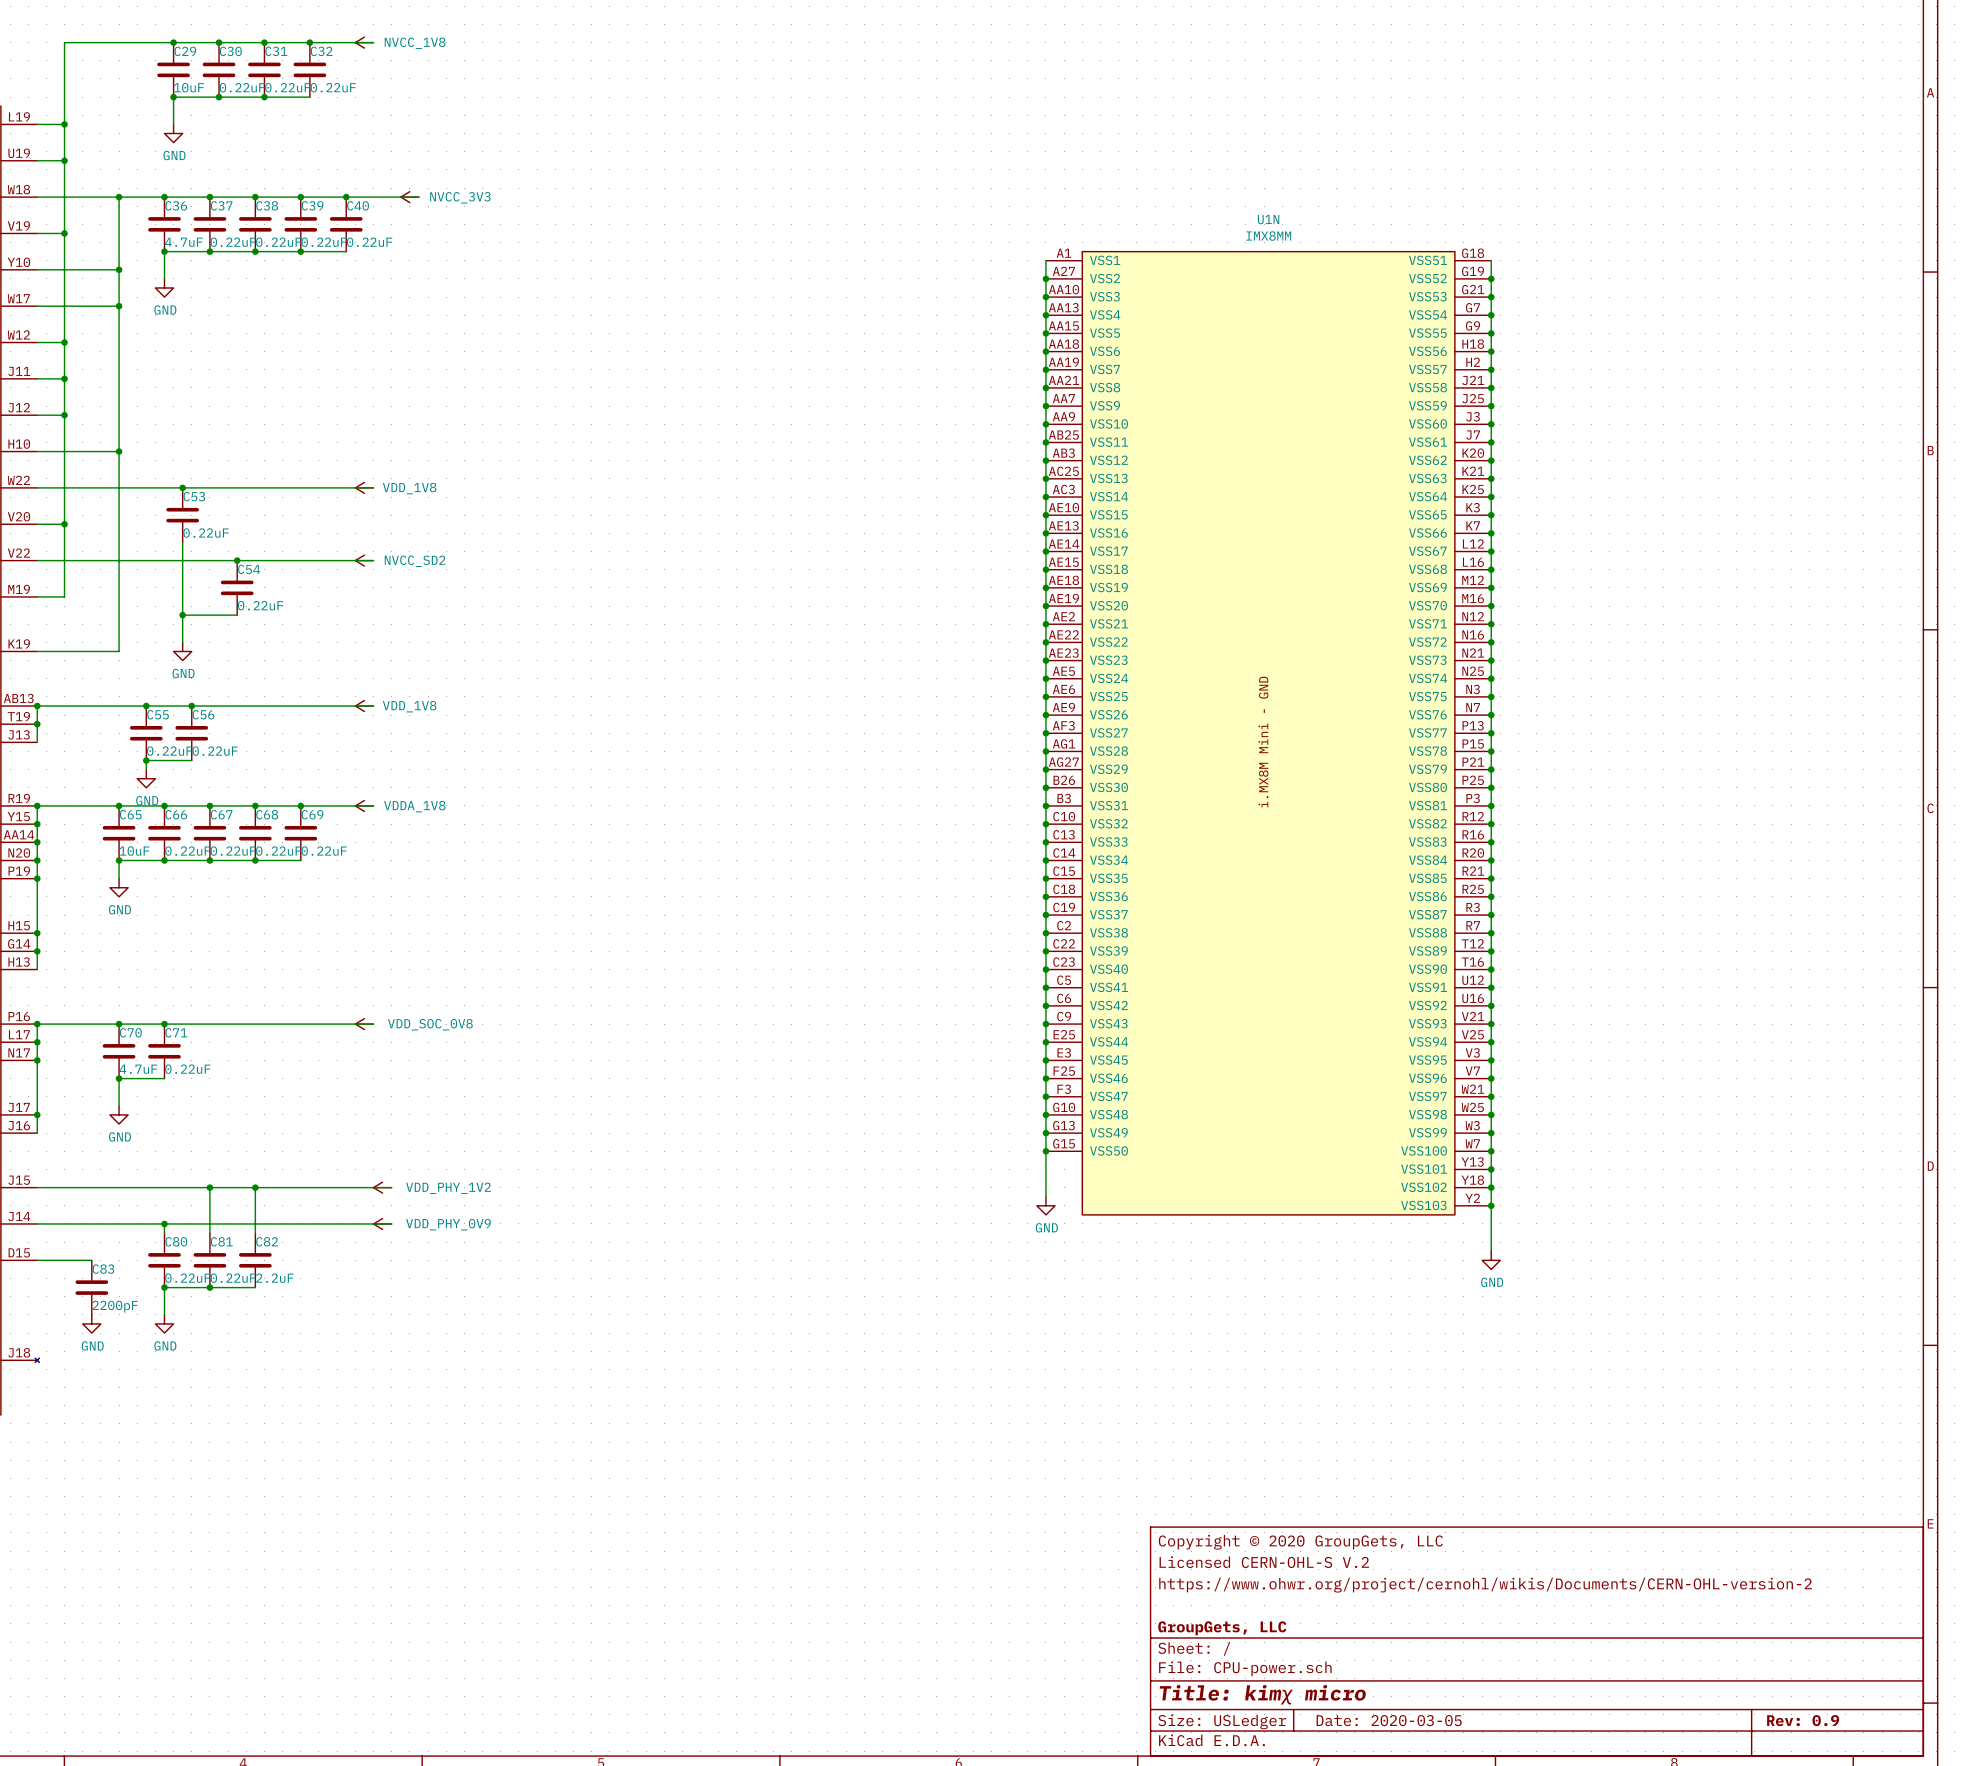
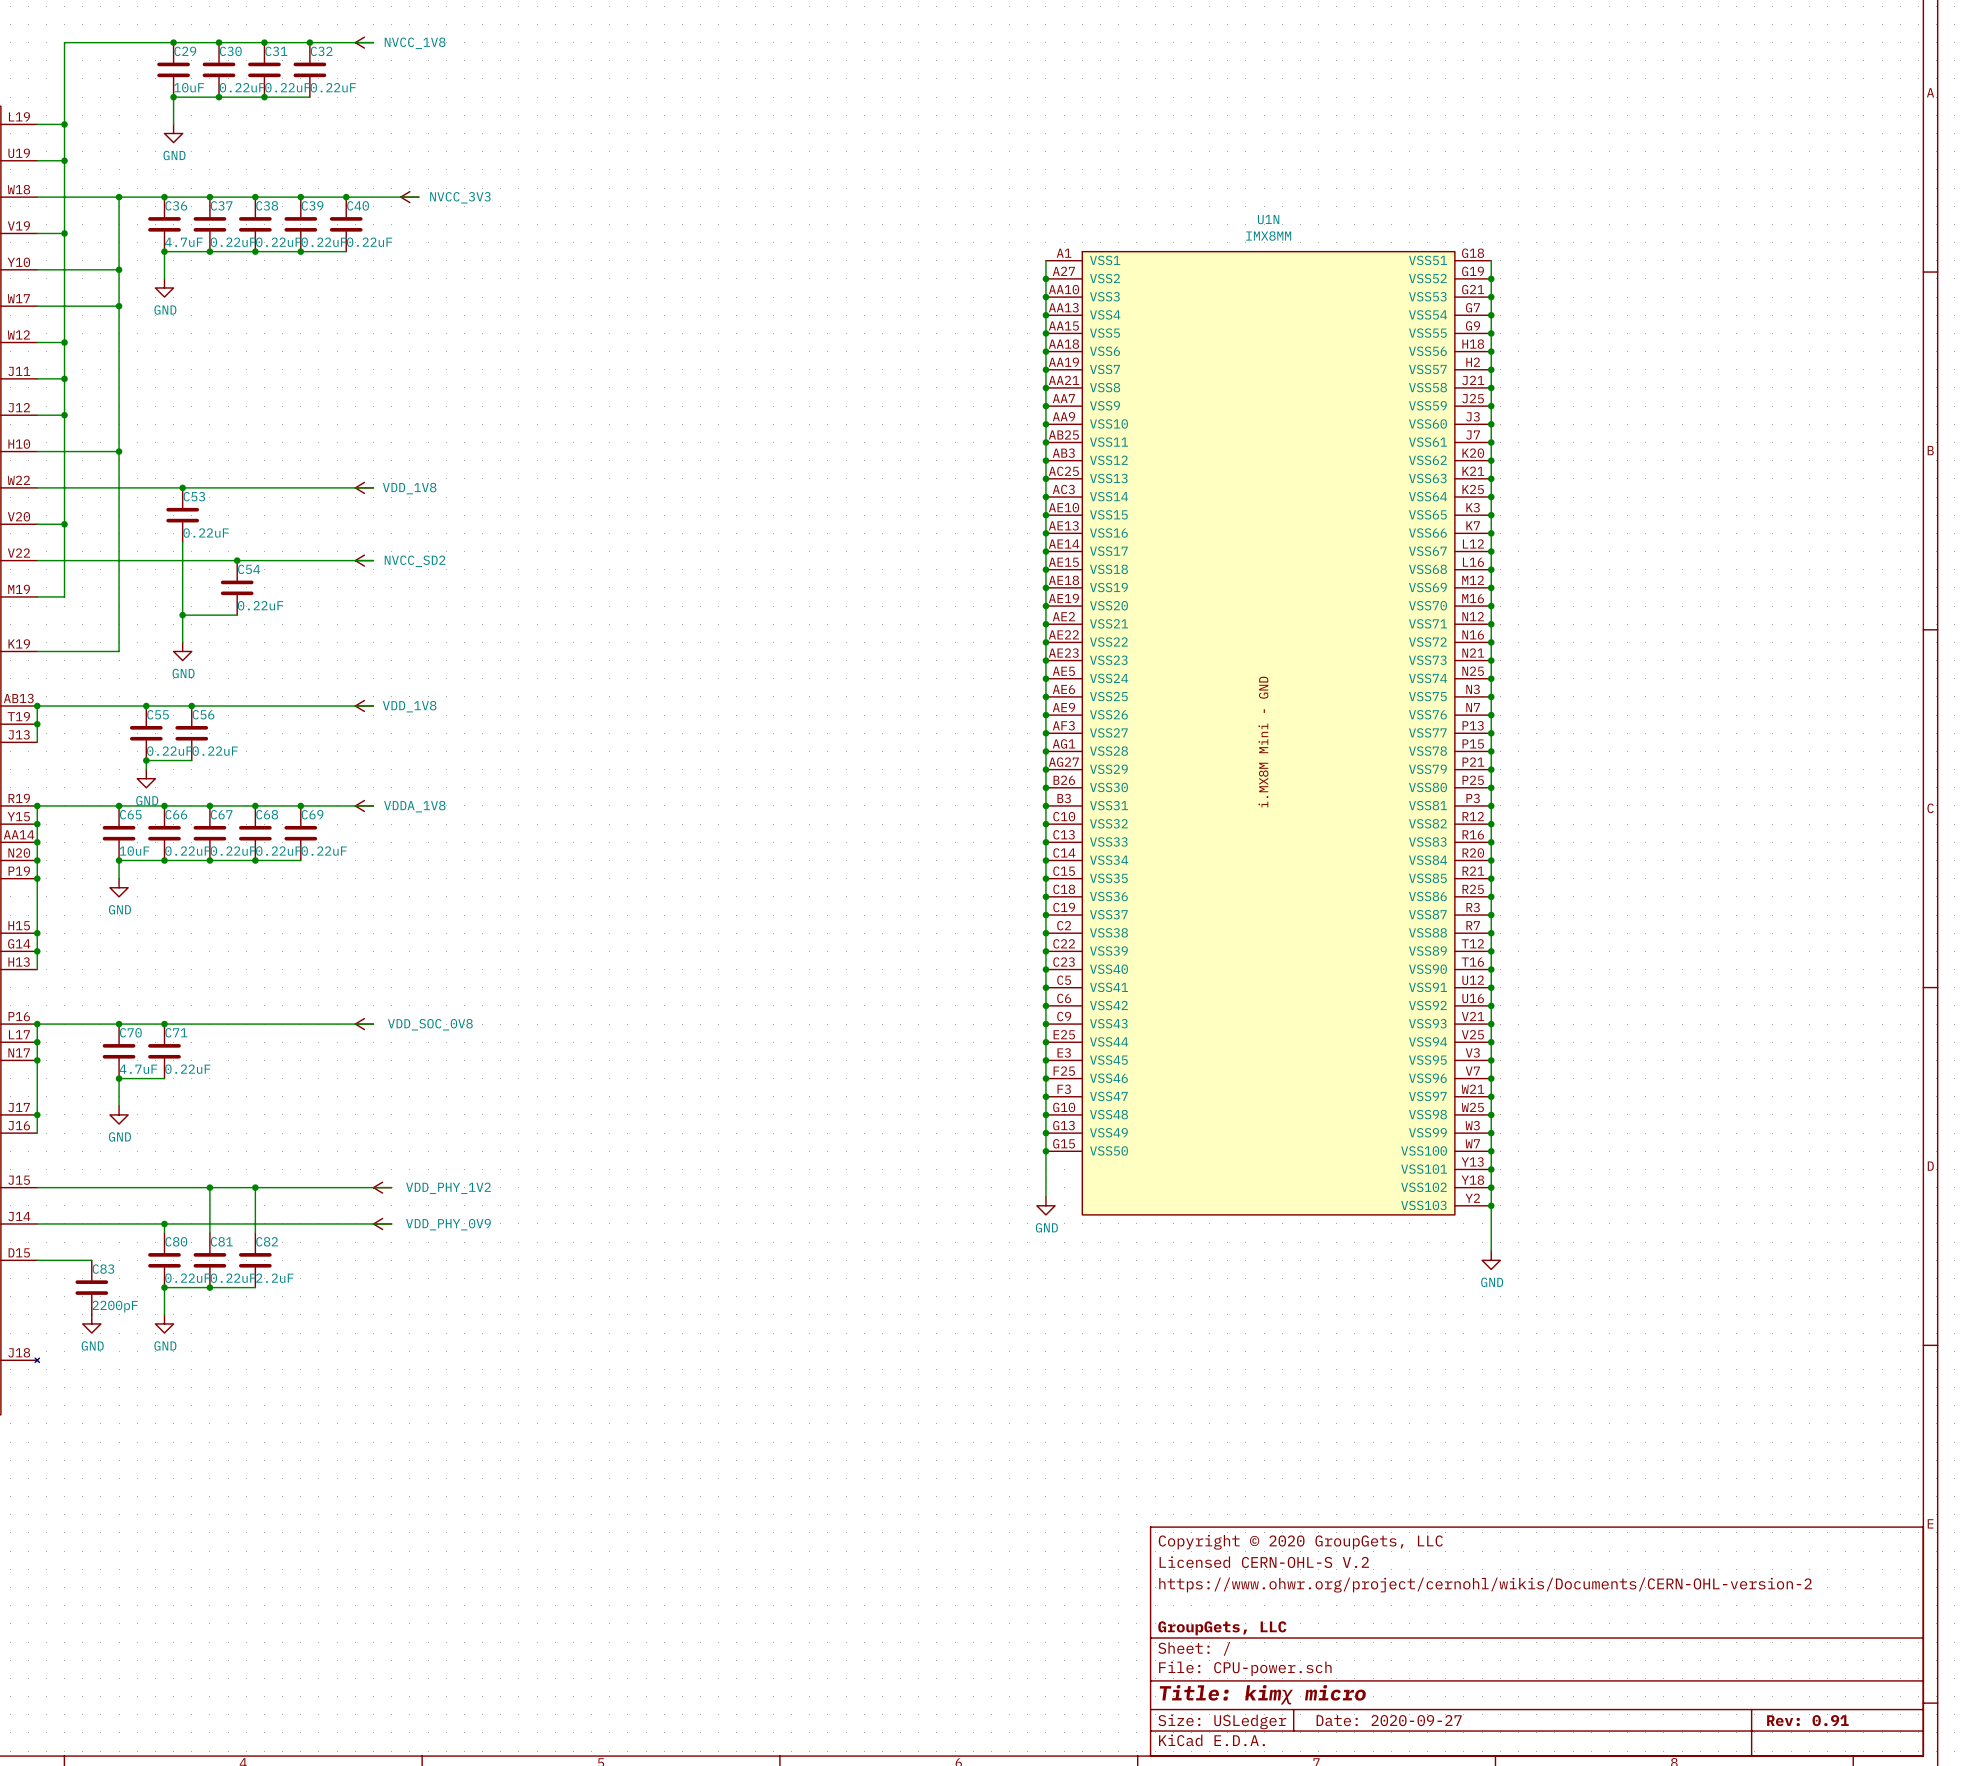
title block: Date: 2020-03-05 (1389, 1720) -> Date: 2020-09-27 (1389, 1720)
title block: Rev: 0.9 (1803, 1720) -> Rev: 0.91 (1807, 1720)

